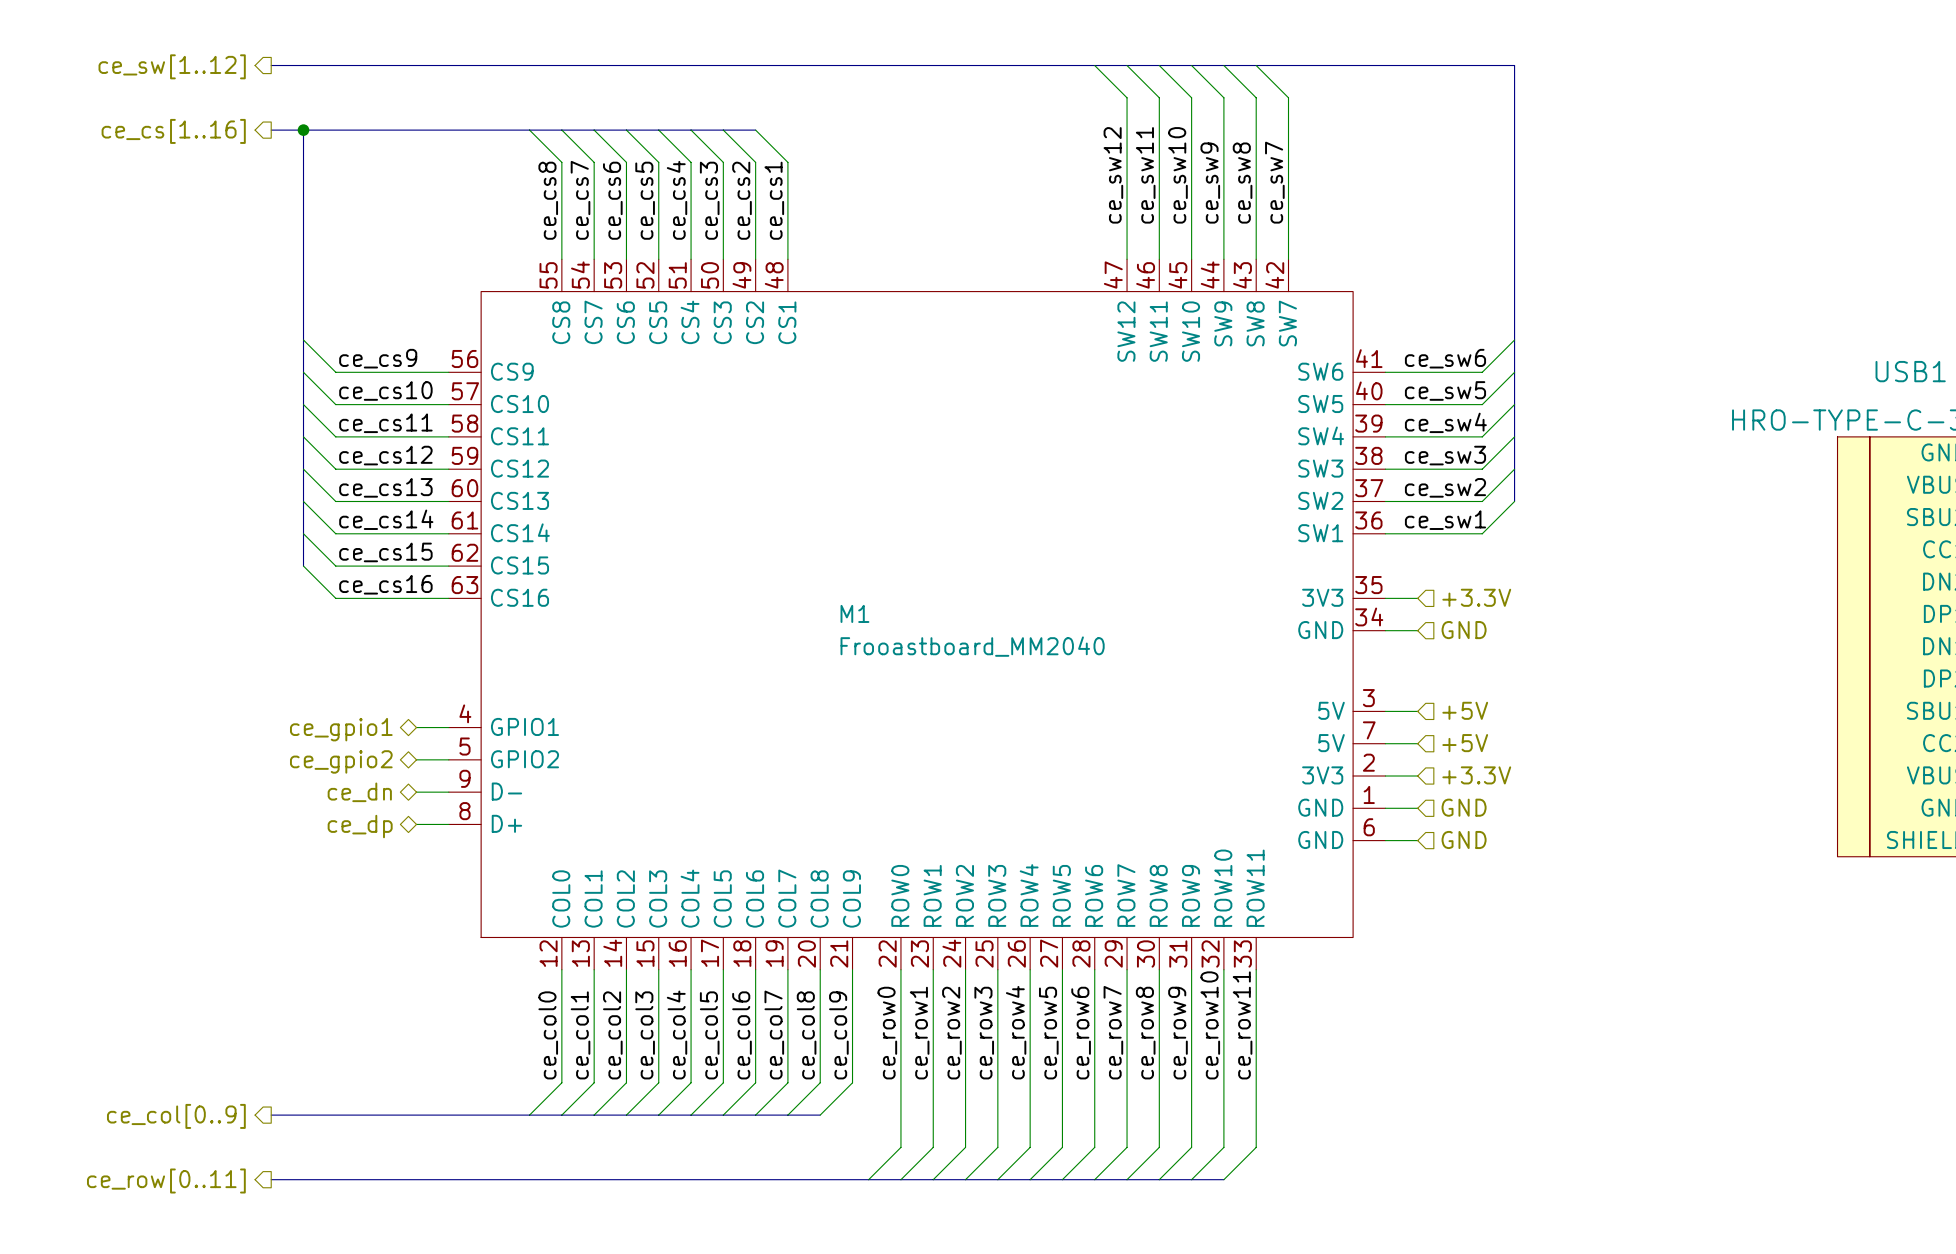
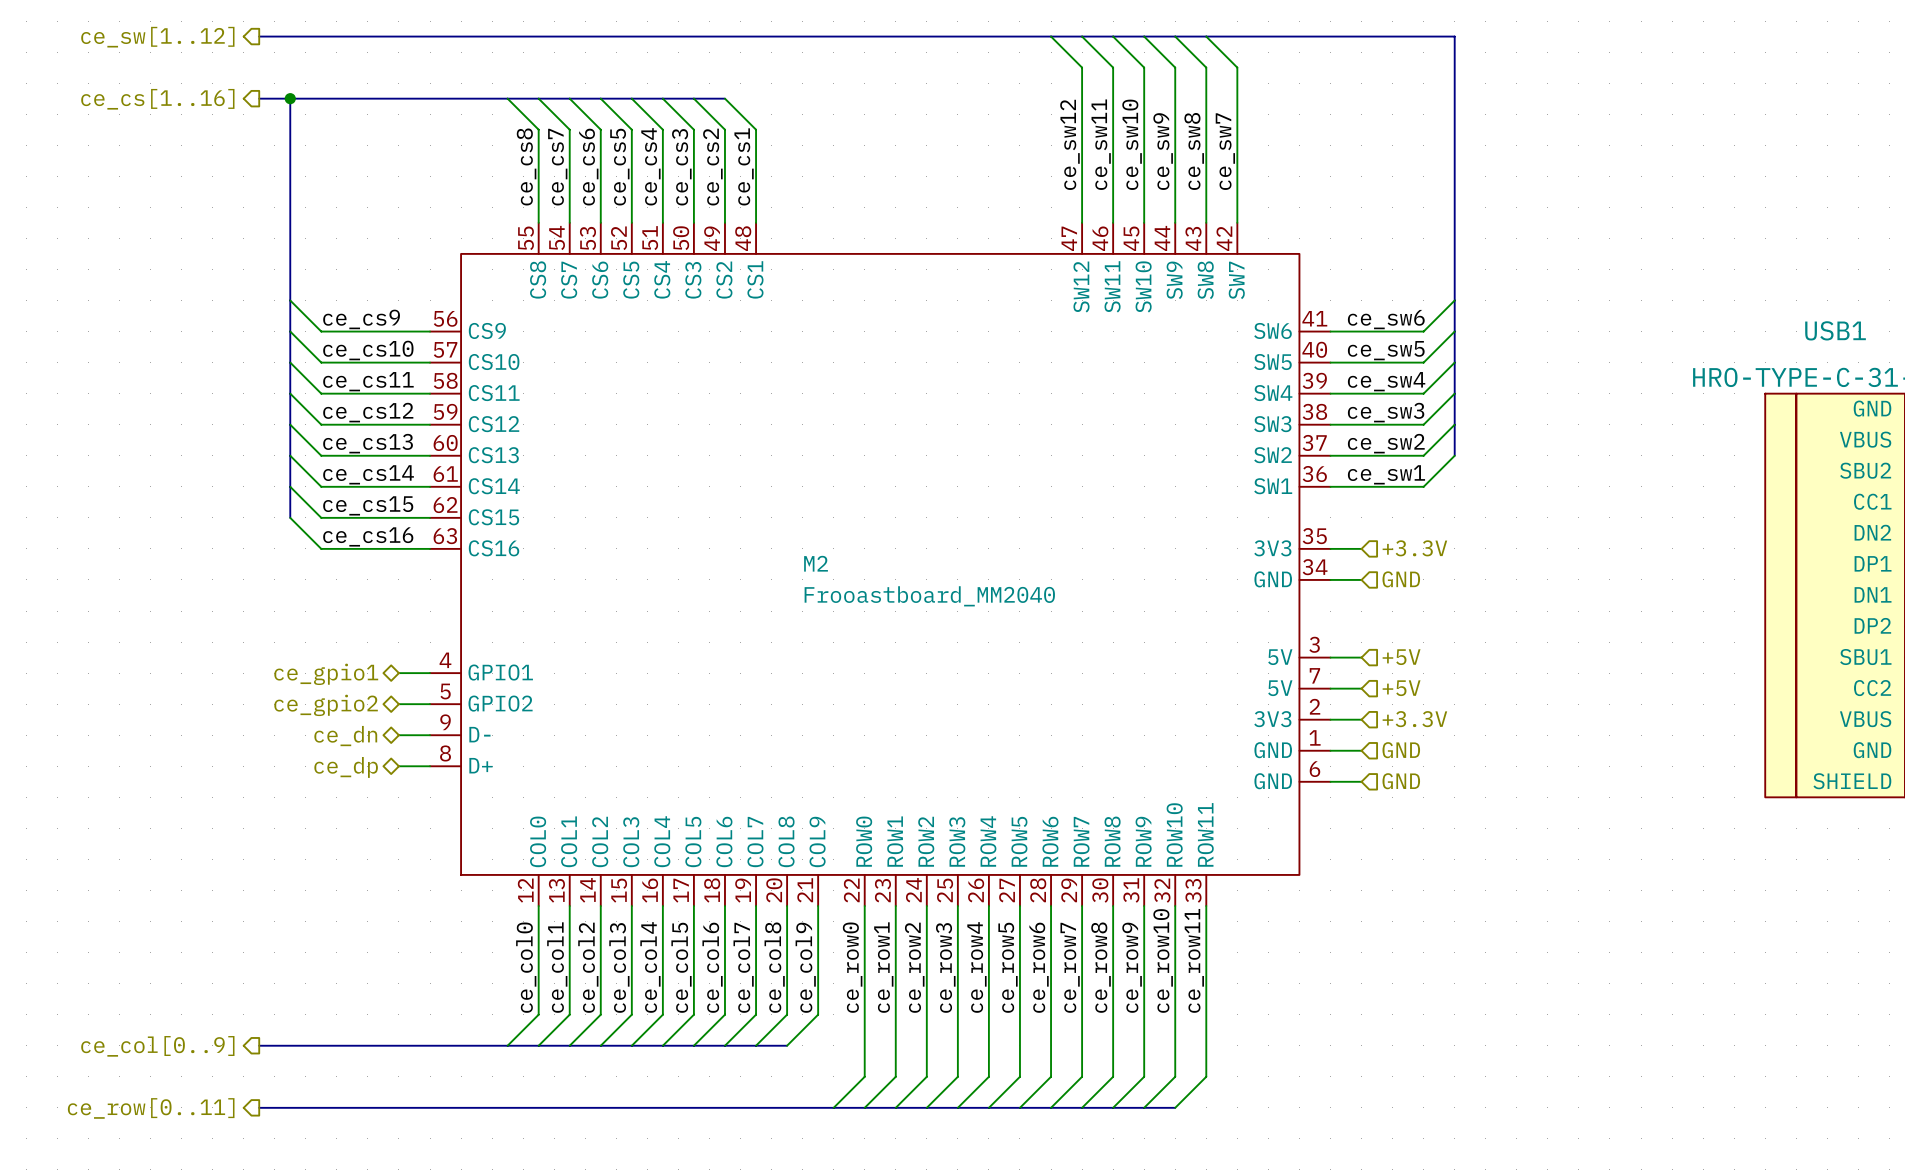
M1 name: M1 (854, 613) -> M2 (816, 563)

